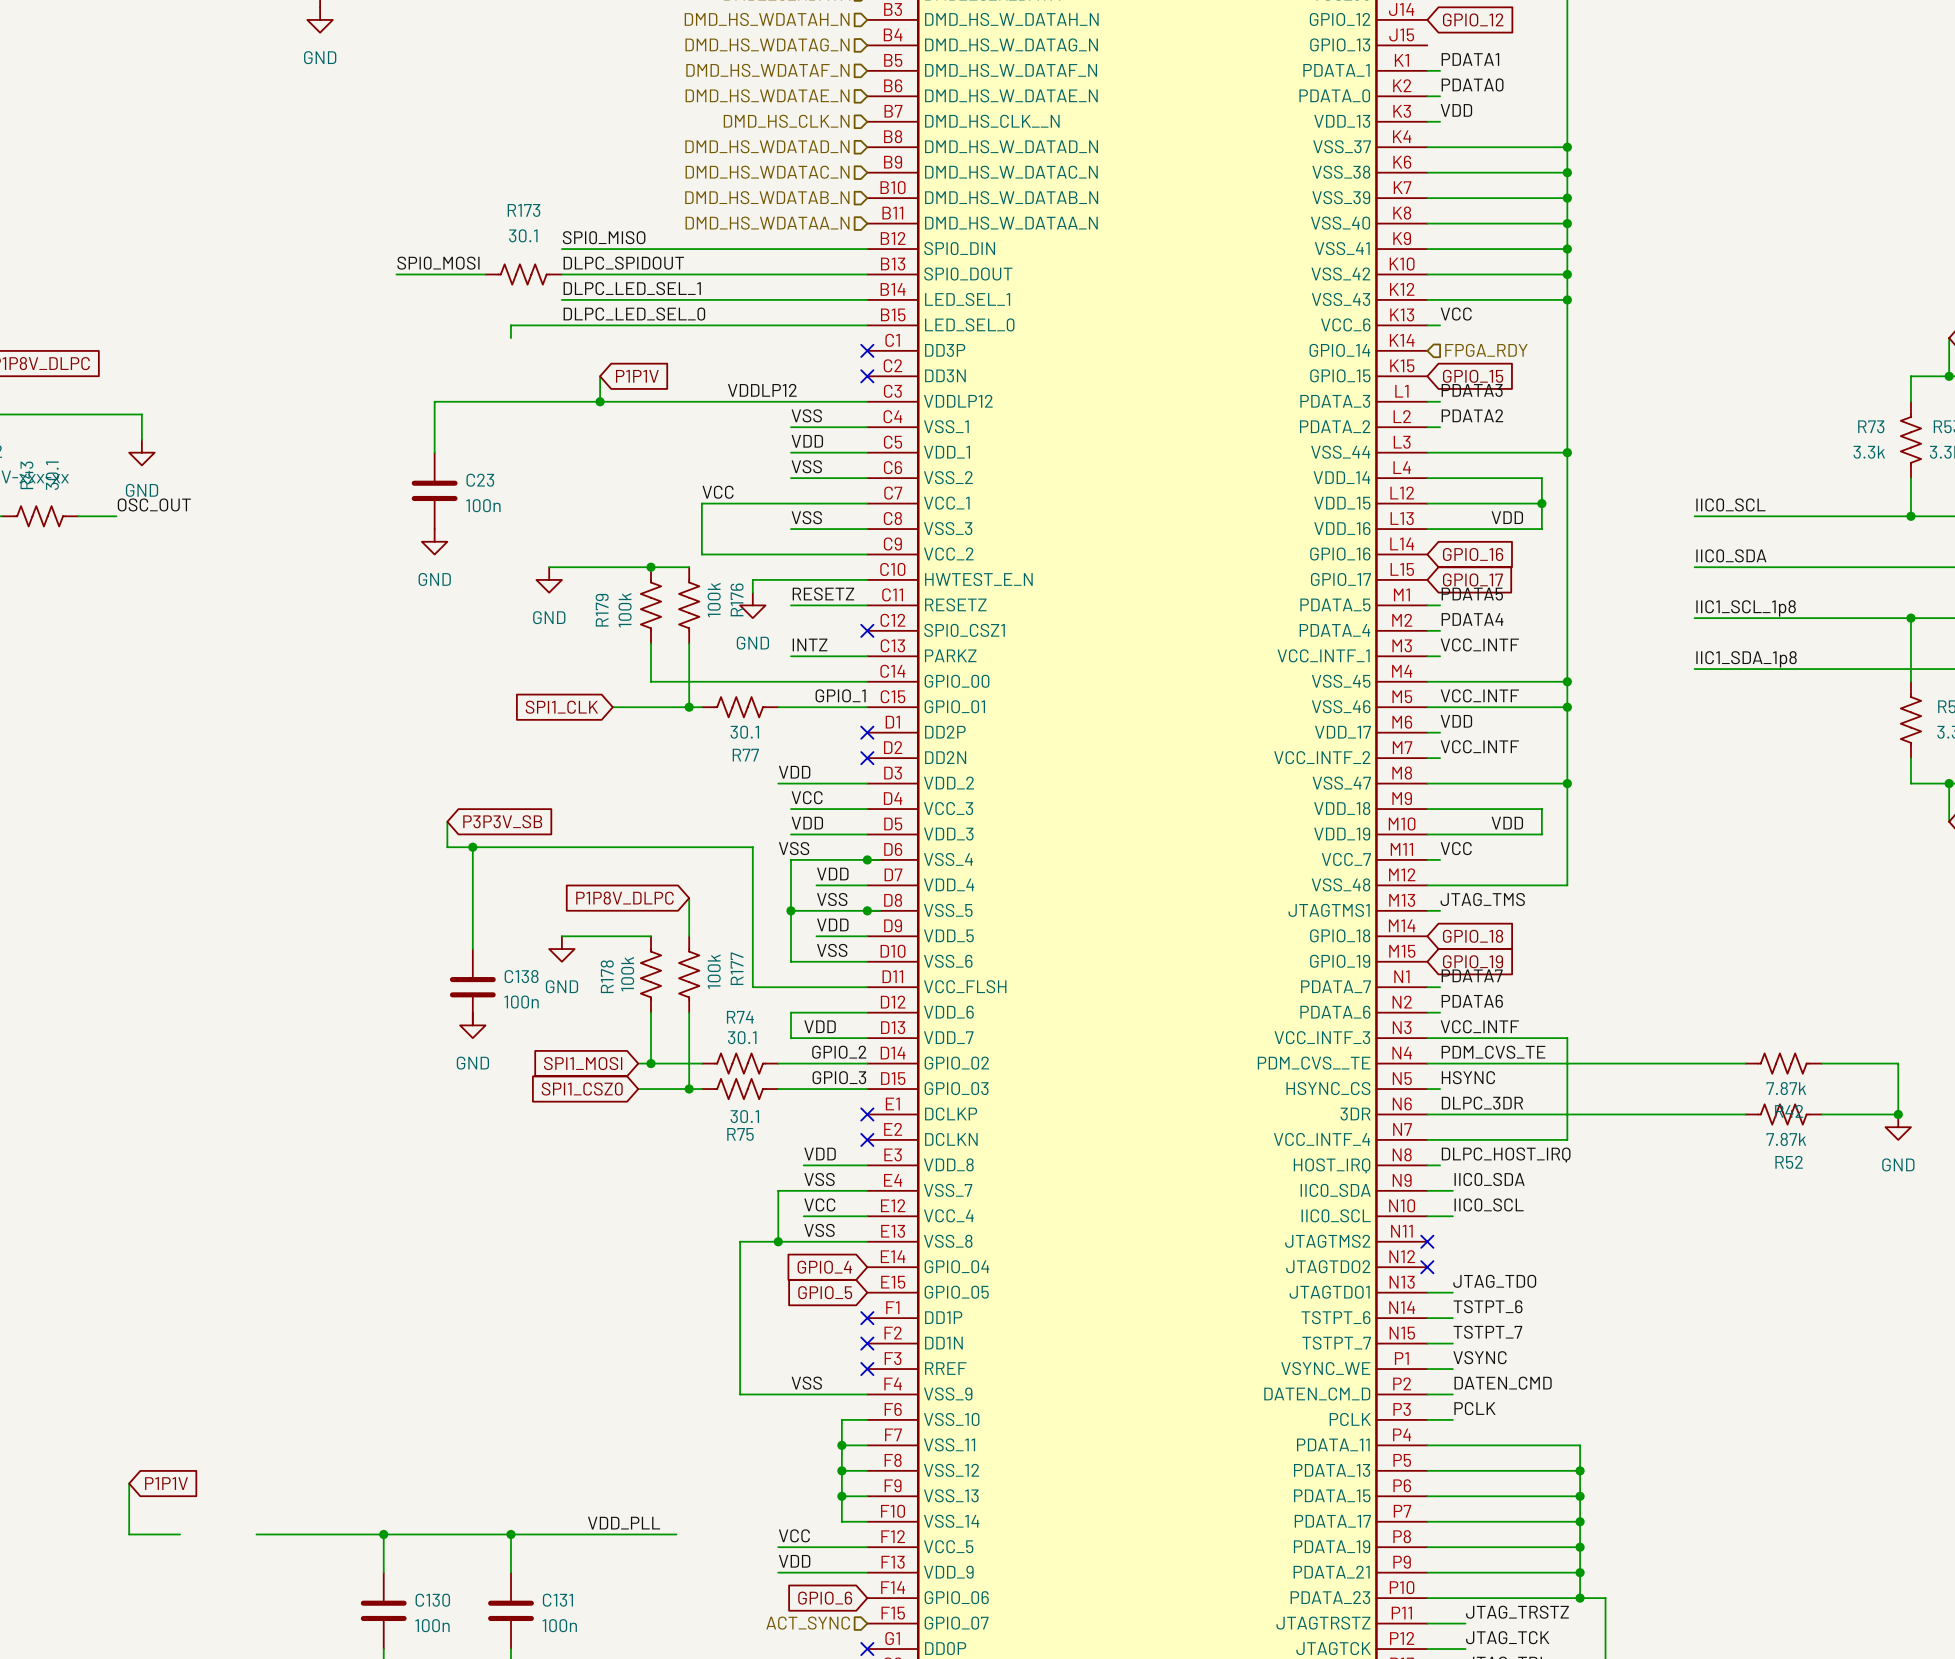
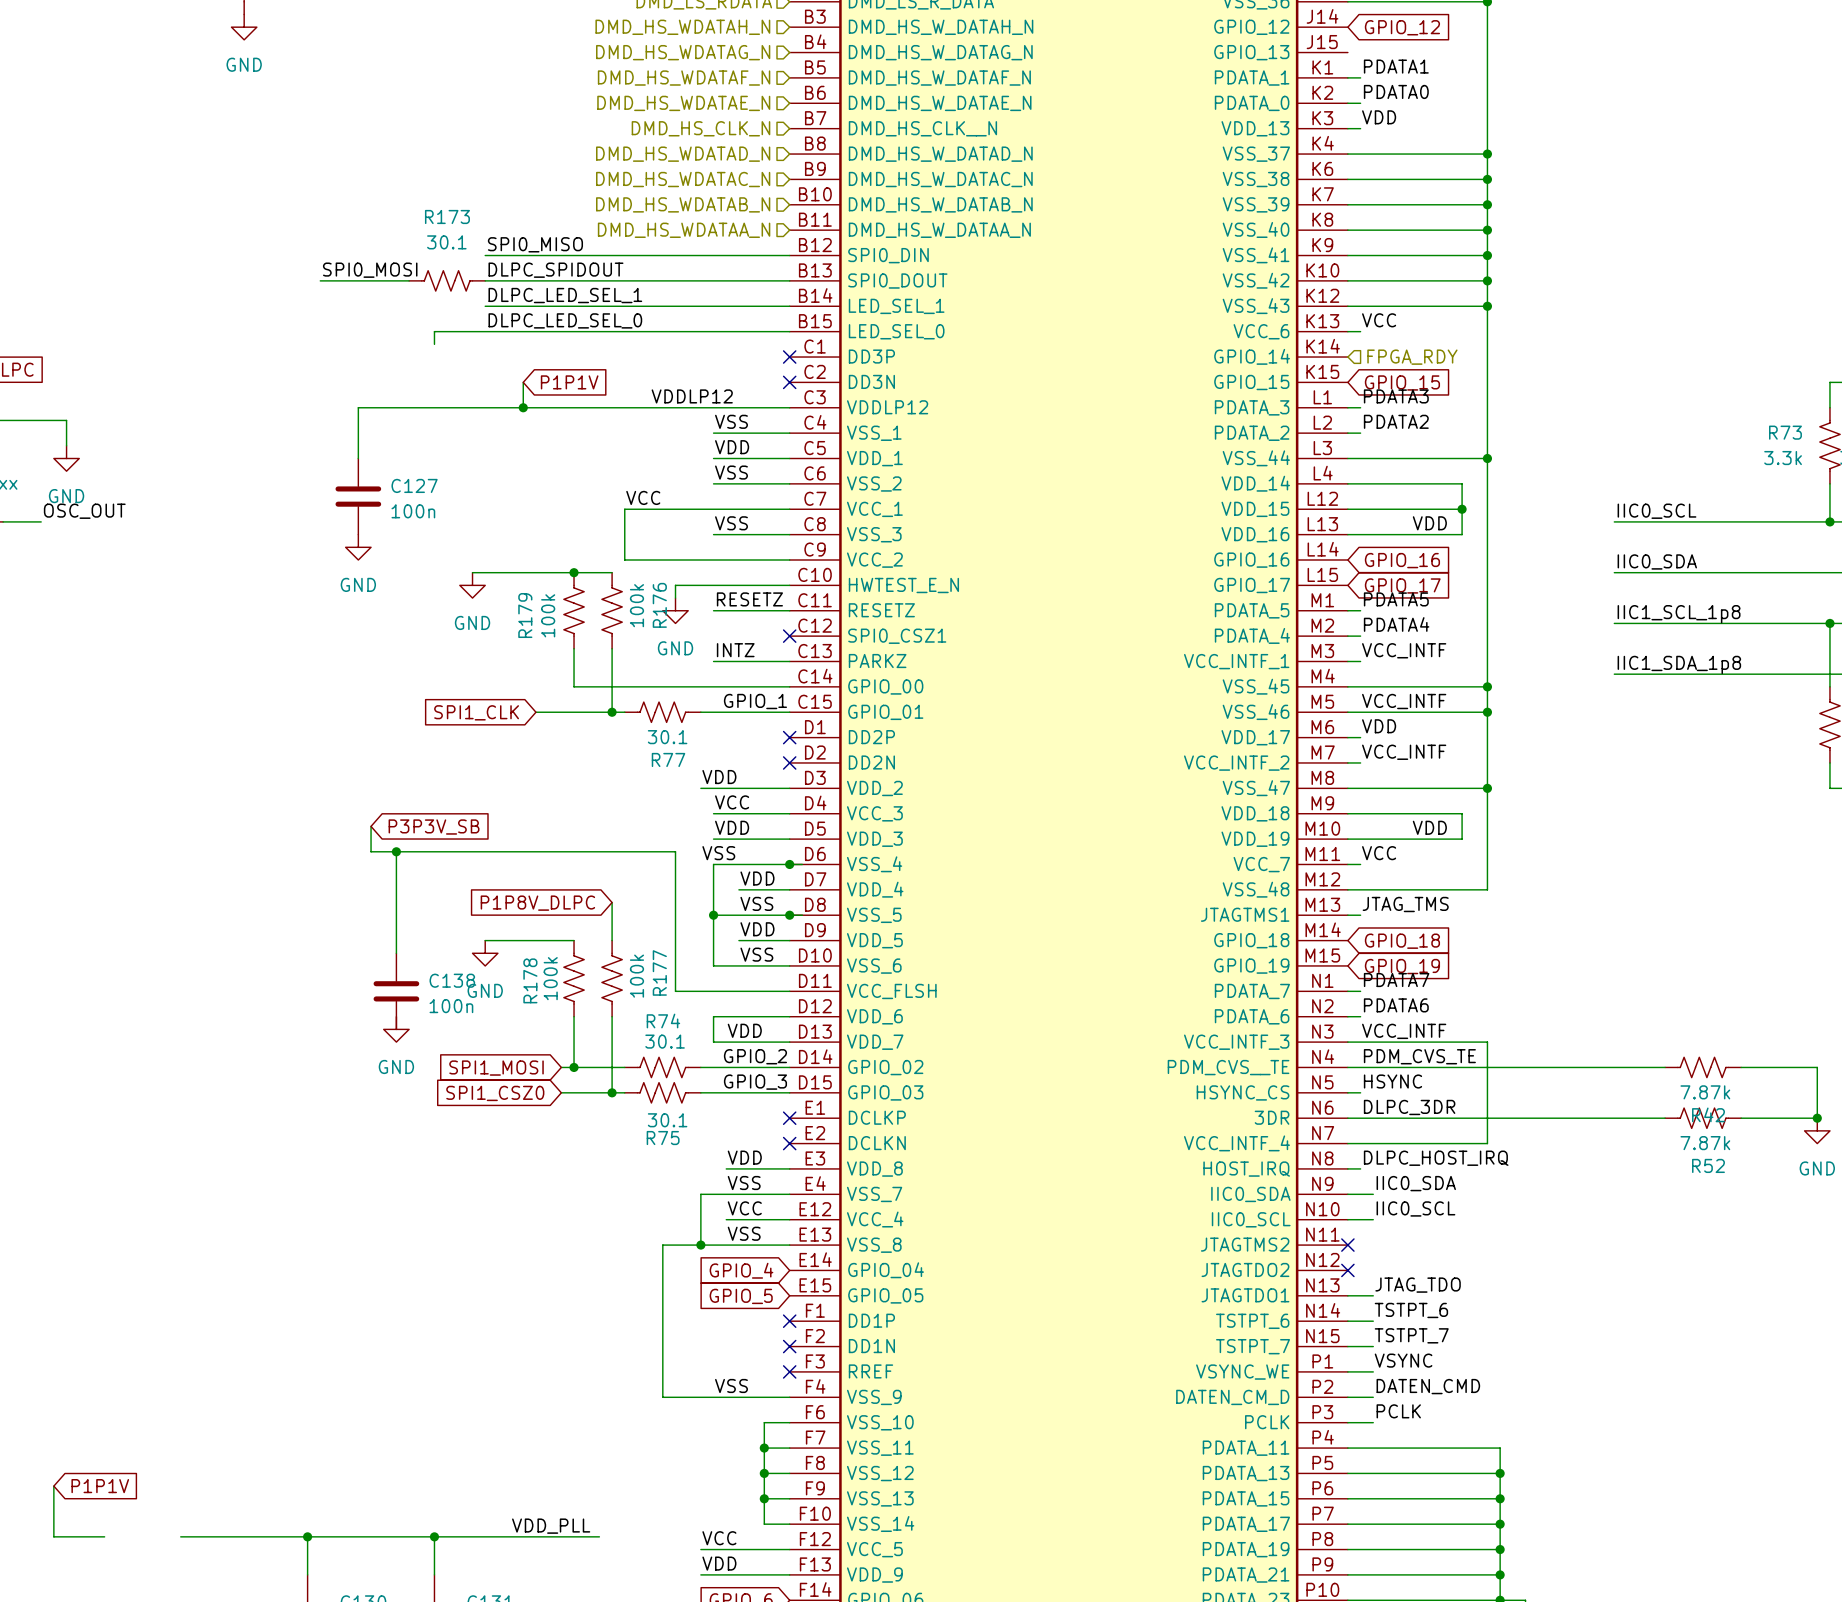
C23 name: C23 (480, 480) -> C127 (414, 485)

